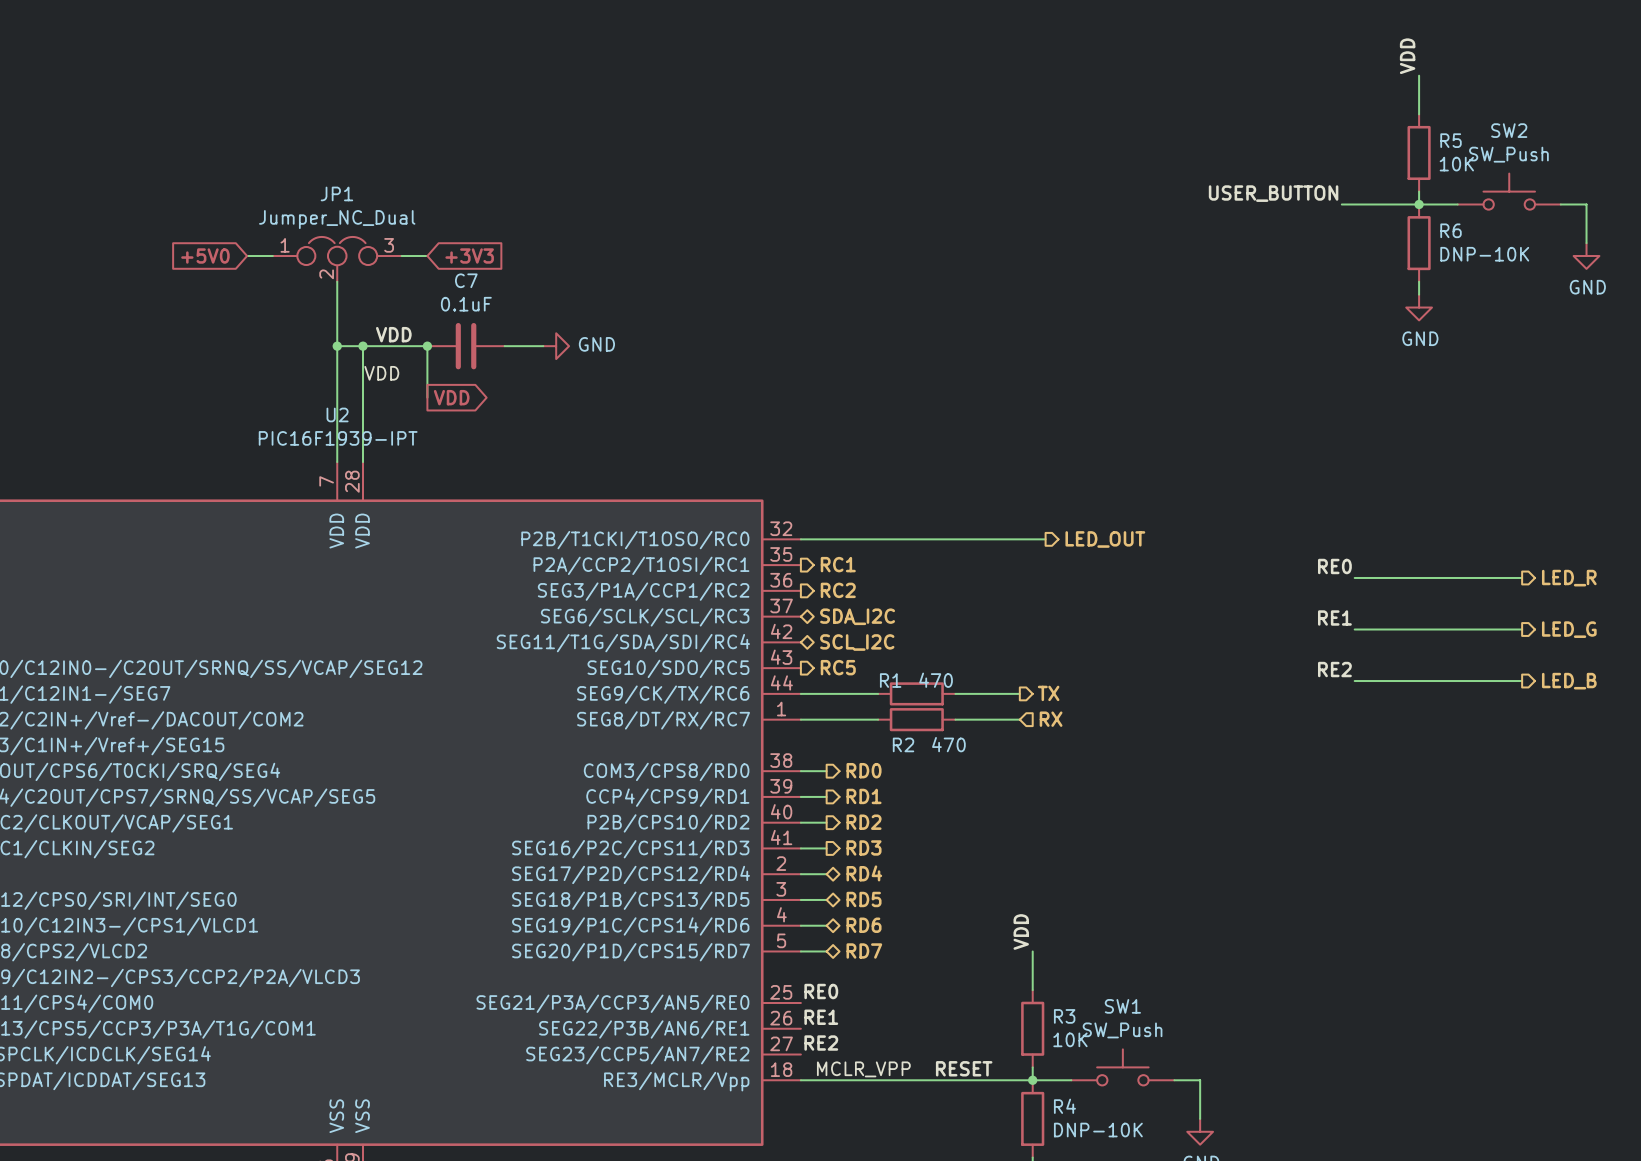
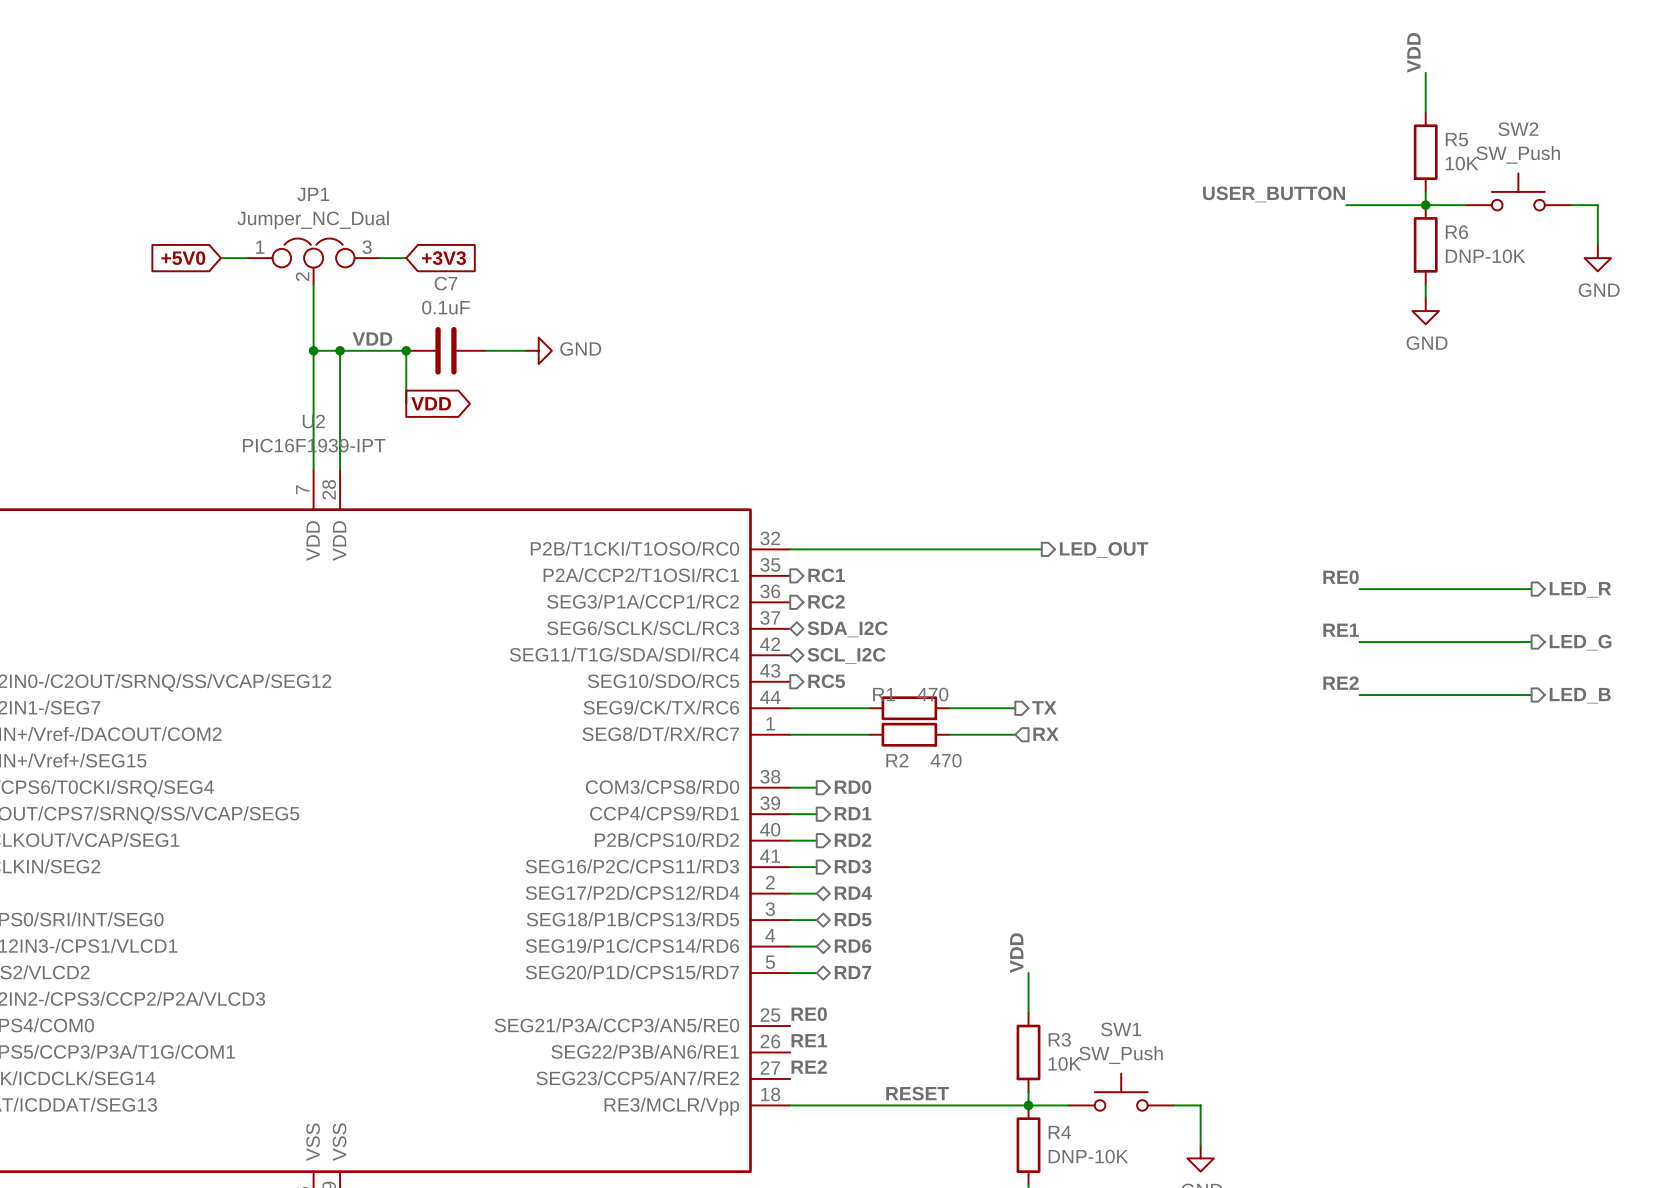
label: VDD (381, 373) -> none
label position: RESET (964, 1068) -> RESET (917, 1093)
label: MCLR_VPP (863, 1069) -> none

